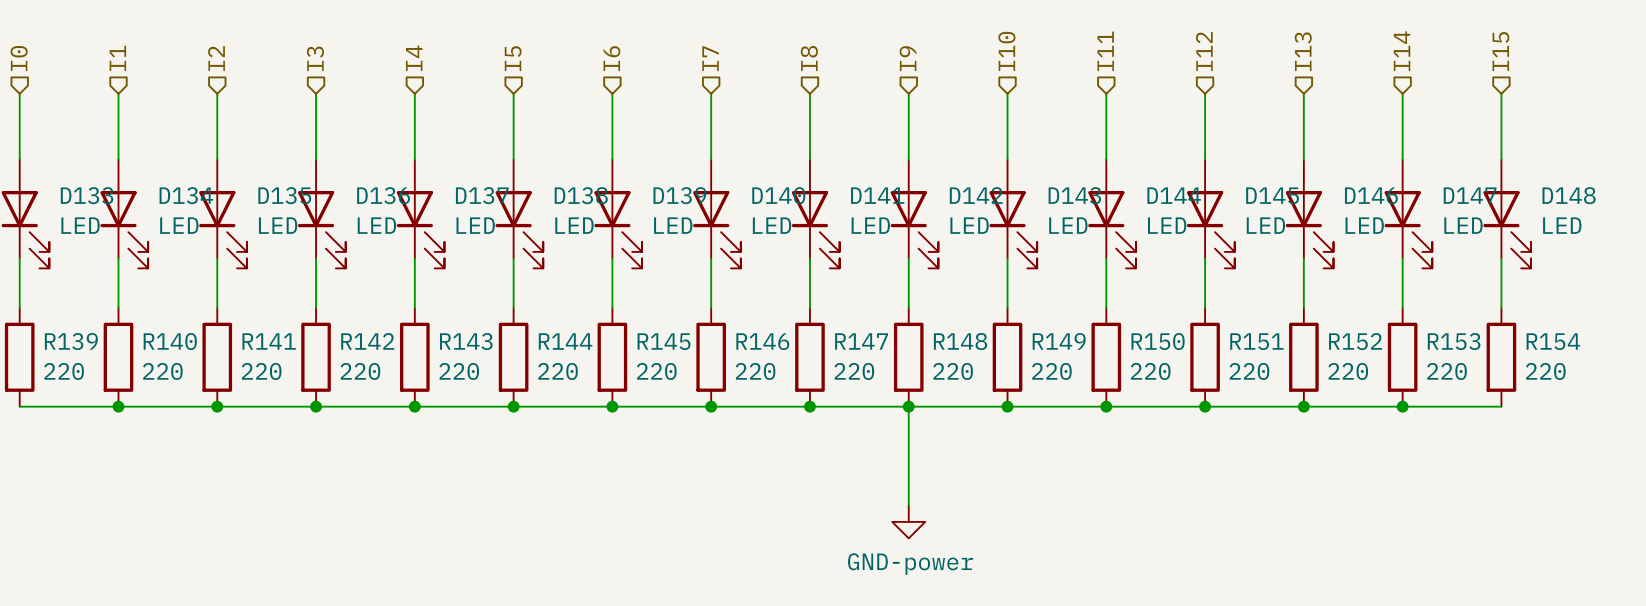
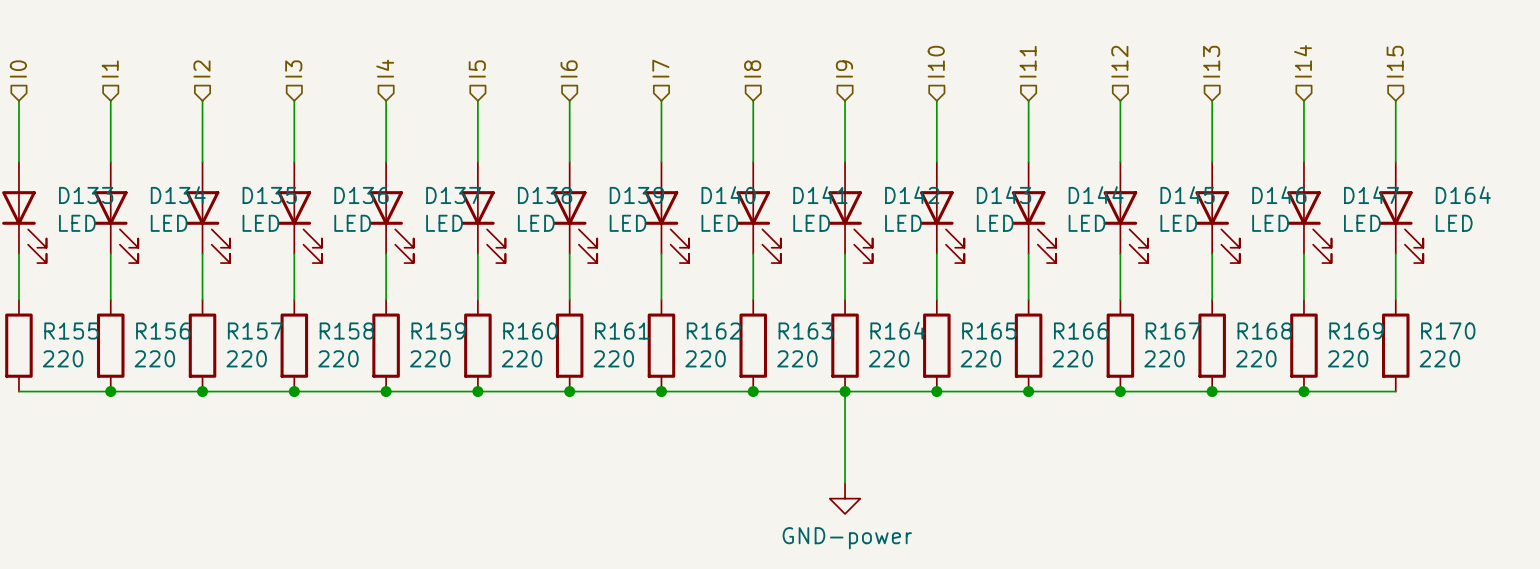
D148 name: D148 (1569, 195) -> D164 (1463, 195)
R139 name: R139 (71, 341) -> R155 (71, 331)
R140 name: R140 (170, 341) -> R156 (163, 331)
R141 name: R141 (269, 341) -> R157 (255, 331)
R142 name: R142 (367, 341) -> R158 (346, 331)
R143 name: R143 (466, 341) -> R159 (438, 331)
R144 name: R144 (565, 341) -> R160 (530, 331)
R145 name: R145 (664, 341) -> R161 (622, 331)
R146 name: R146 (762, 341) -> R162 (713, 331)
R147 name: R147 (861, 341) -> R163 (805, 331)
R148 name: R148 (960, 341) -> R164 (897, 330)
R149 name: R149 (1059, 341) -> R165 (989, 331)
R150 name: R150 (1158, 341) -> R166 (1081, 331)
R151 name: R151 (1256, 341) -> R167 (1173, 331)
R152 name: R152 (1355, 341) -> R168 (1264, 331)
R153 name: R153 (1454, 341) -> R169 (1356, 331)
R154 name: R154 (1553, 341) -> R170 (1448, 331)

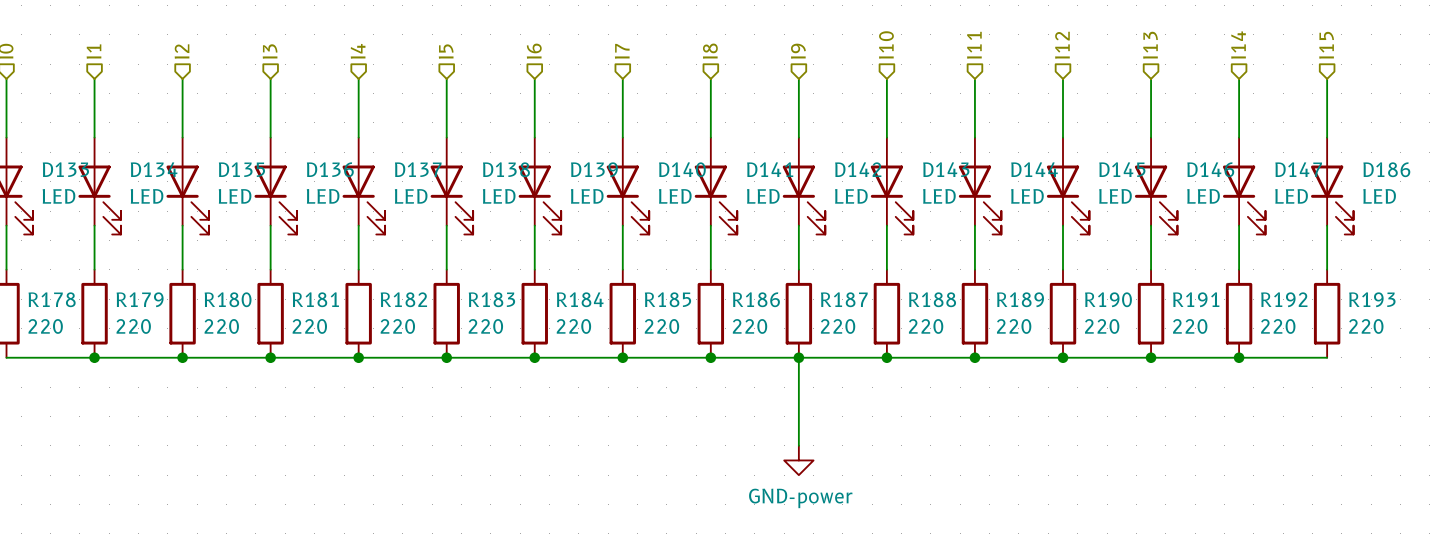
D164 name: D164 (1463, 195) -> D186 (1386, 169)
R164 name: R164 (897, 330) -> R187 (844, 299)
R155 name: R155 (71, 331) -> R178 (52, 299)
R156 name: R156 (163, 331) -> R179 (140, 299)
R157 name: R157 (255, 331) -> R180 (228, 299)
R158 name: R158 (346, 331) -> R181 (315, 299)
R159 name: R159 (438, 331) -> R182 (403, 299)
R160 name: R160 (530, 331) -> R183 (491, 299)
R161 name: R161 (622, 331) -> R184 (580, 299)
R162 name: R162 (713, 331) -> R185 (667, 299)
R163 name: R163 (805, 331) -> R186 (756, 299)
R165 name: R165 (989, 331) -> R188 (932, 299)
R166 name: R166 (1081, 331) -> R189 (1020, 299)
R167 name: R167 (1173, 331) -> R190 (1108, 299)
R168 name: R168 (1264, 331) -> R191 (1196, 299)
R169 name: R169 (1356, 331) -> R192 (1284, 299)
R170 name: R170 (1448, 331) -> R193 (1372, 299)

